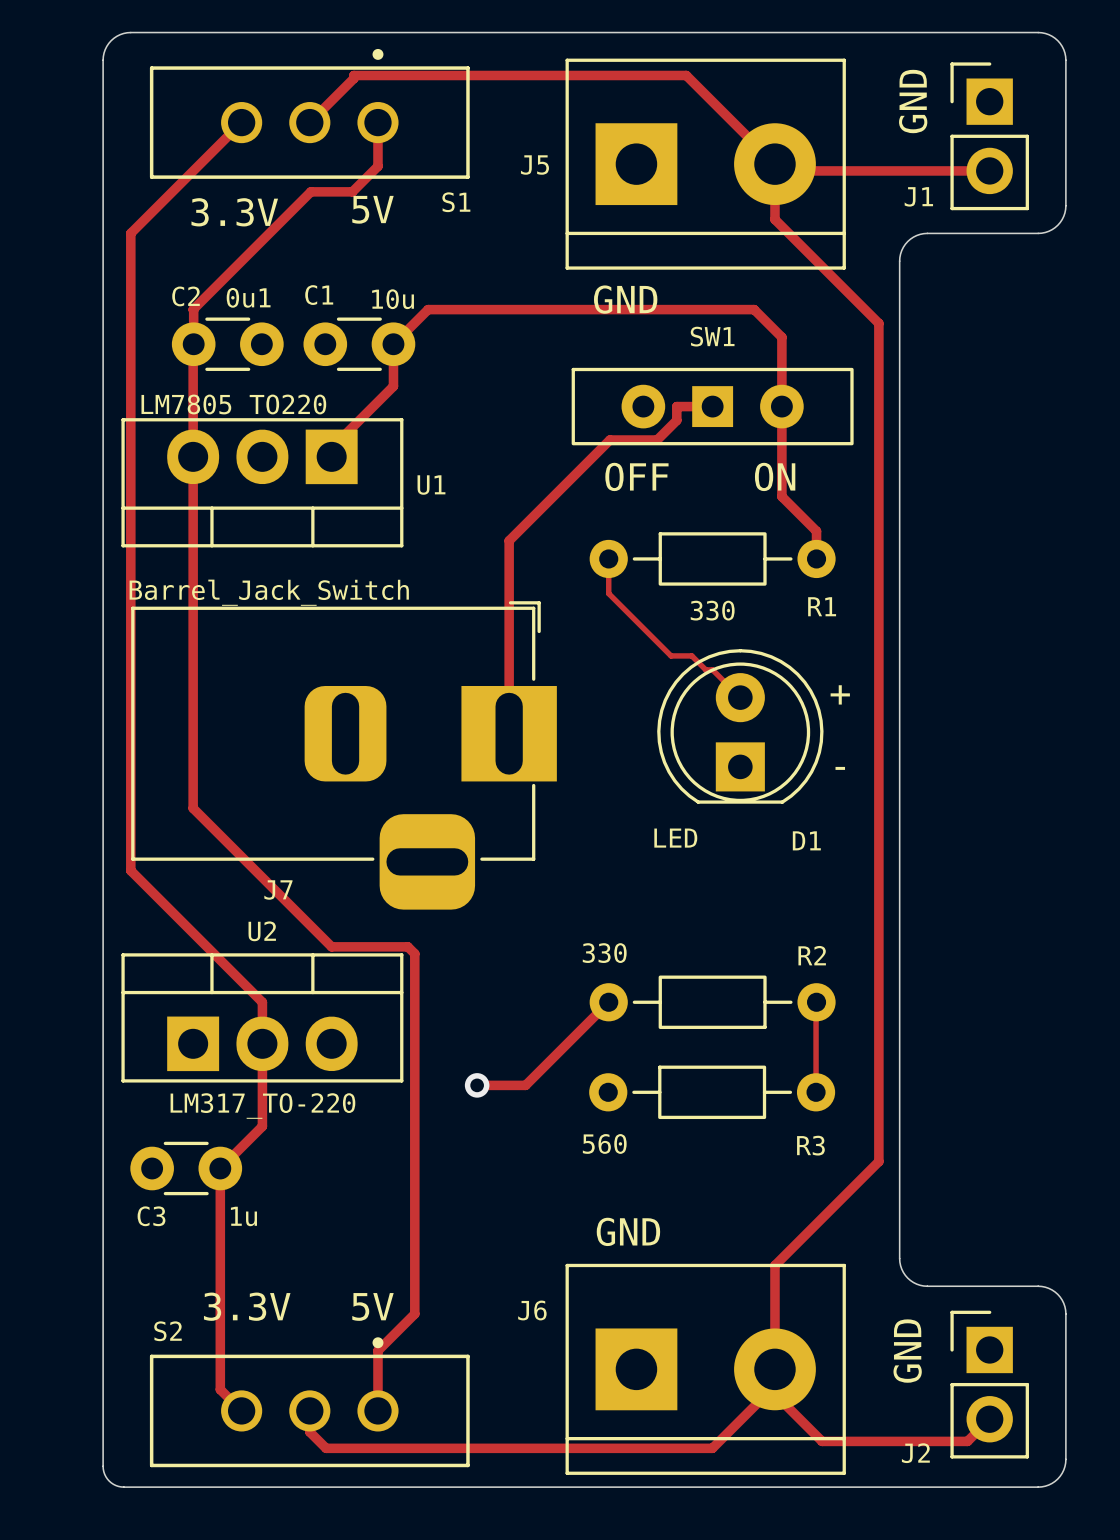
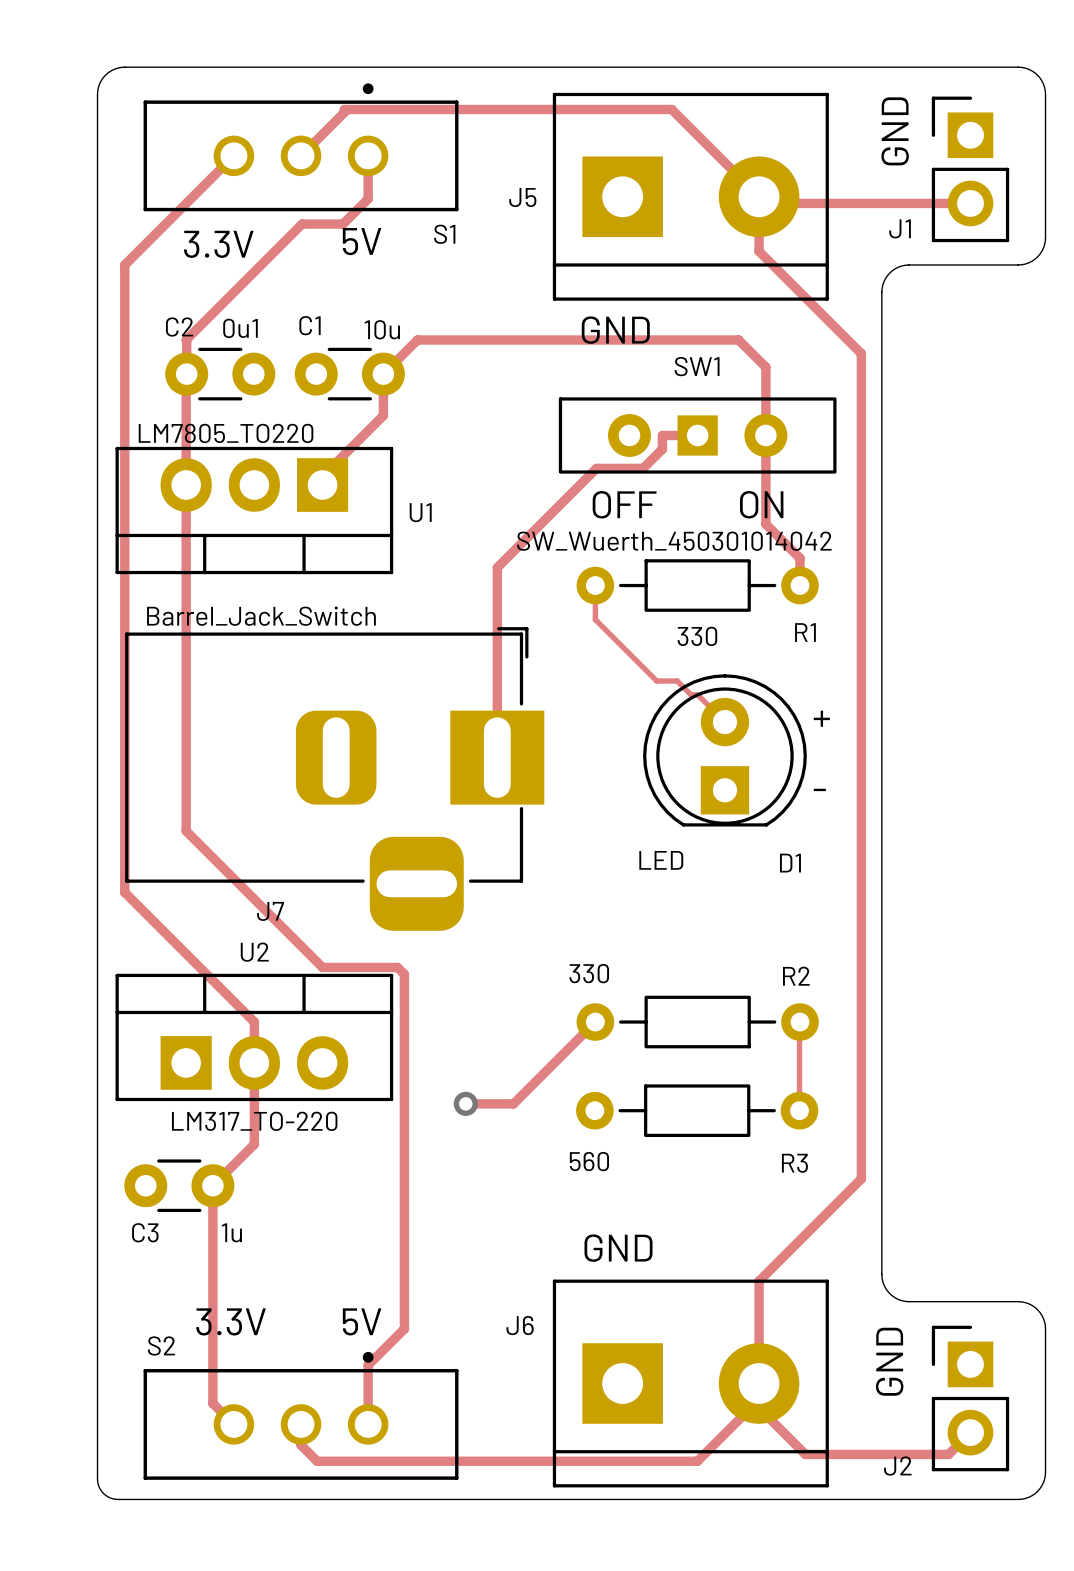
SW1 value: none -> SW_Wuerth_450301014042 (674, 541)

